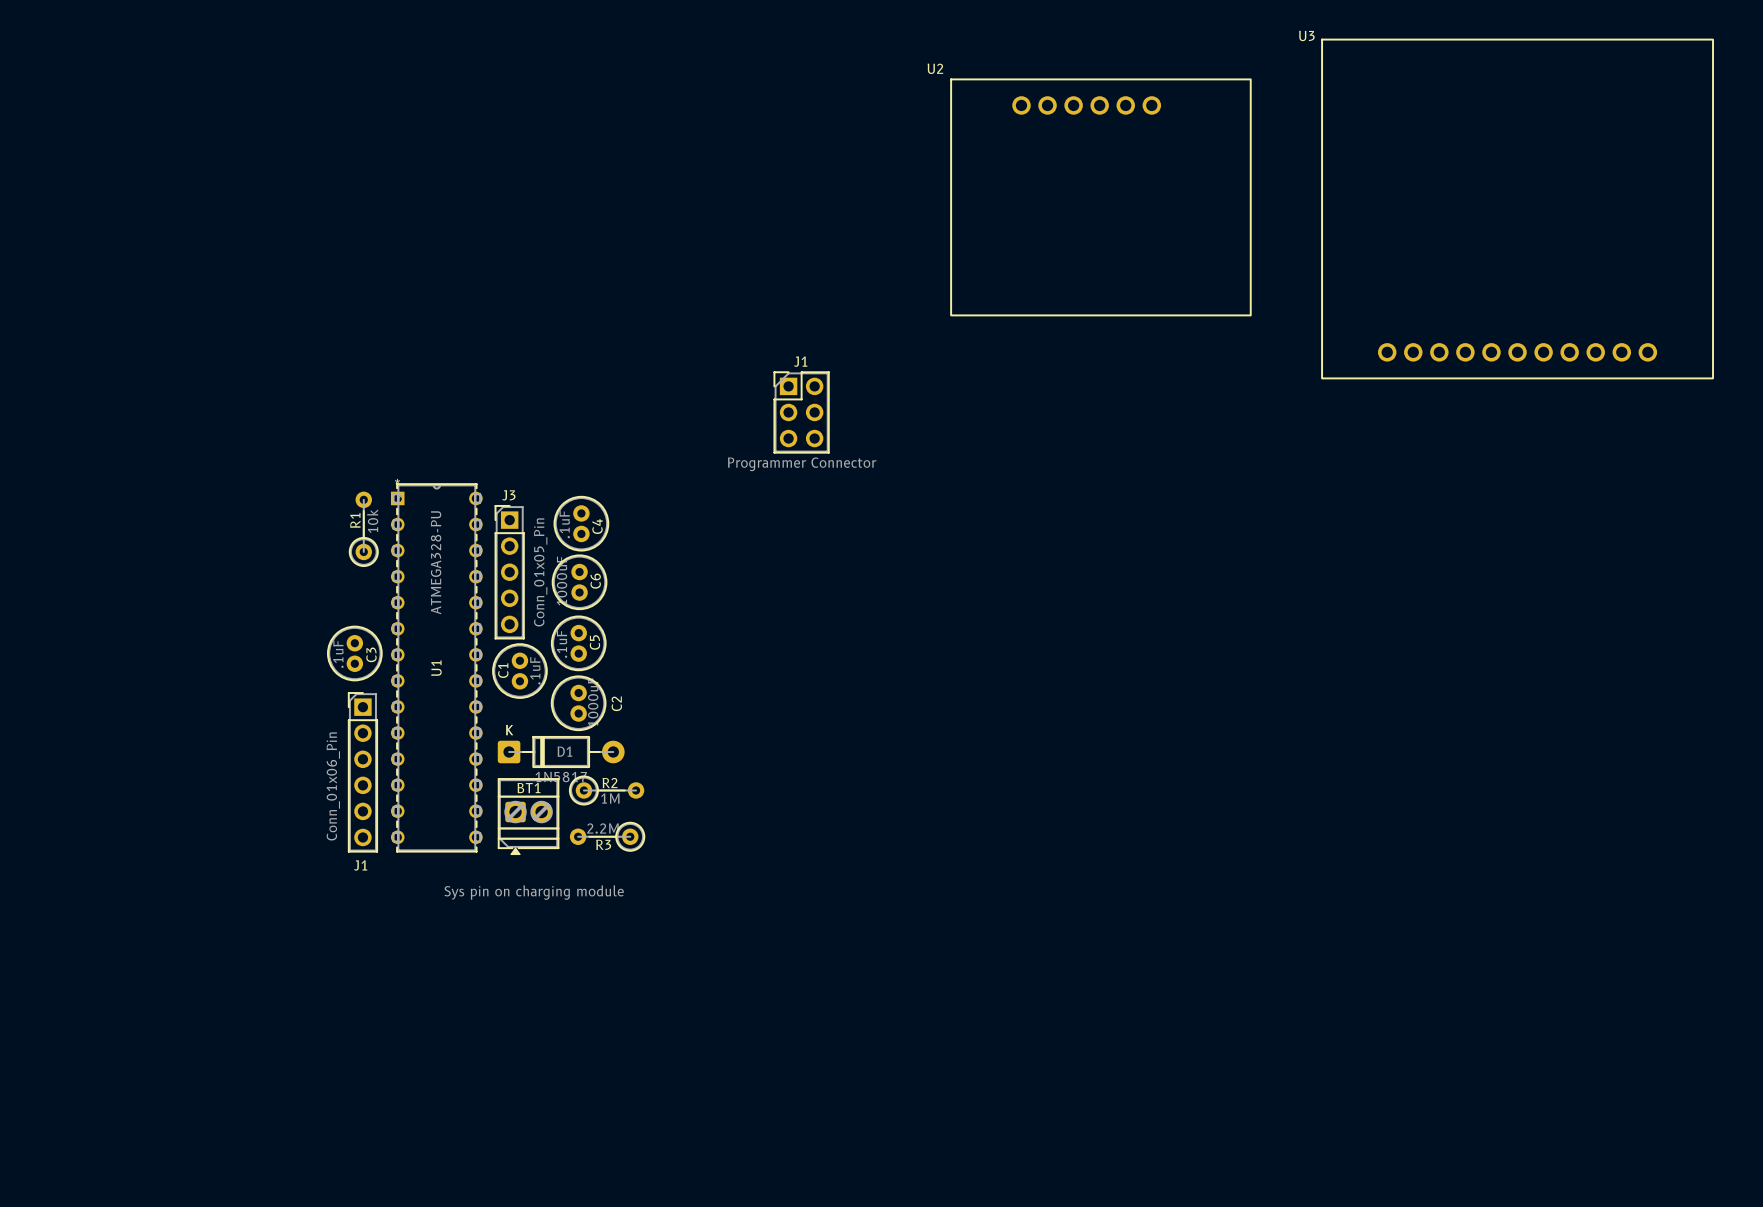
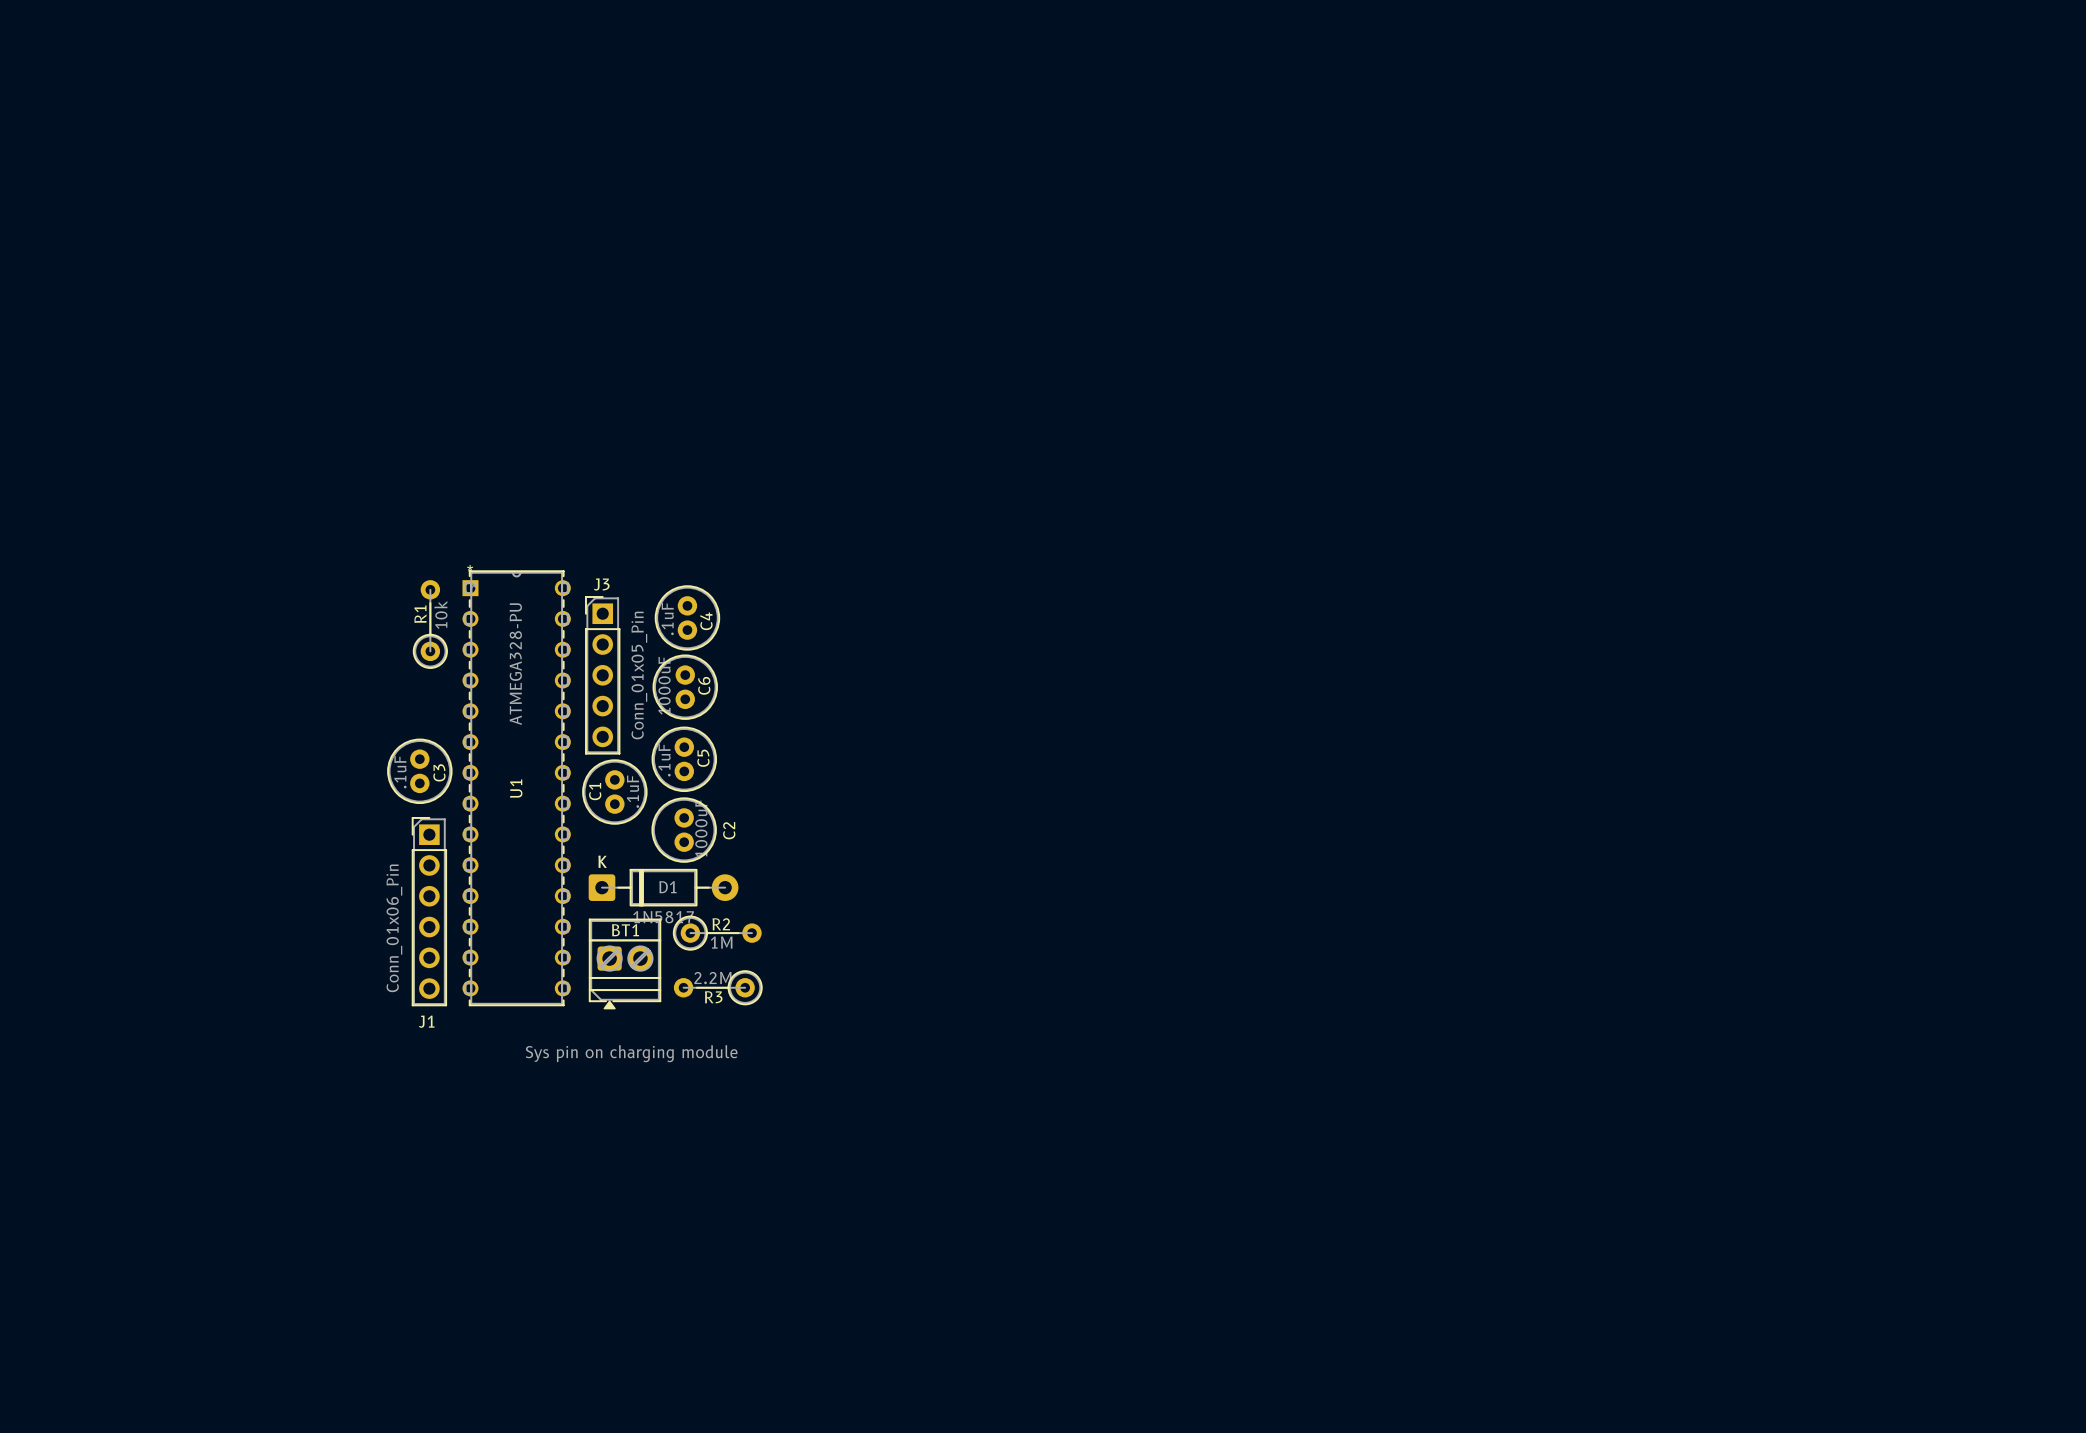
U2: (1100, 197) -> none
U3: (1517, 208) -> none
J1: Programmer Connector (801, 412) -> none

